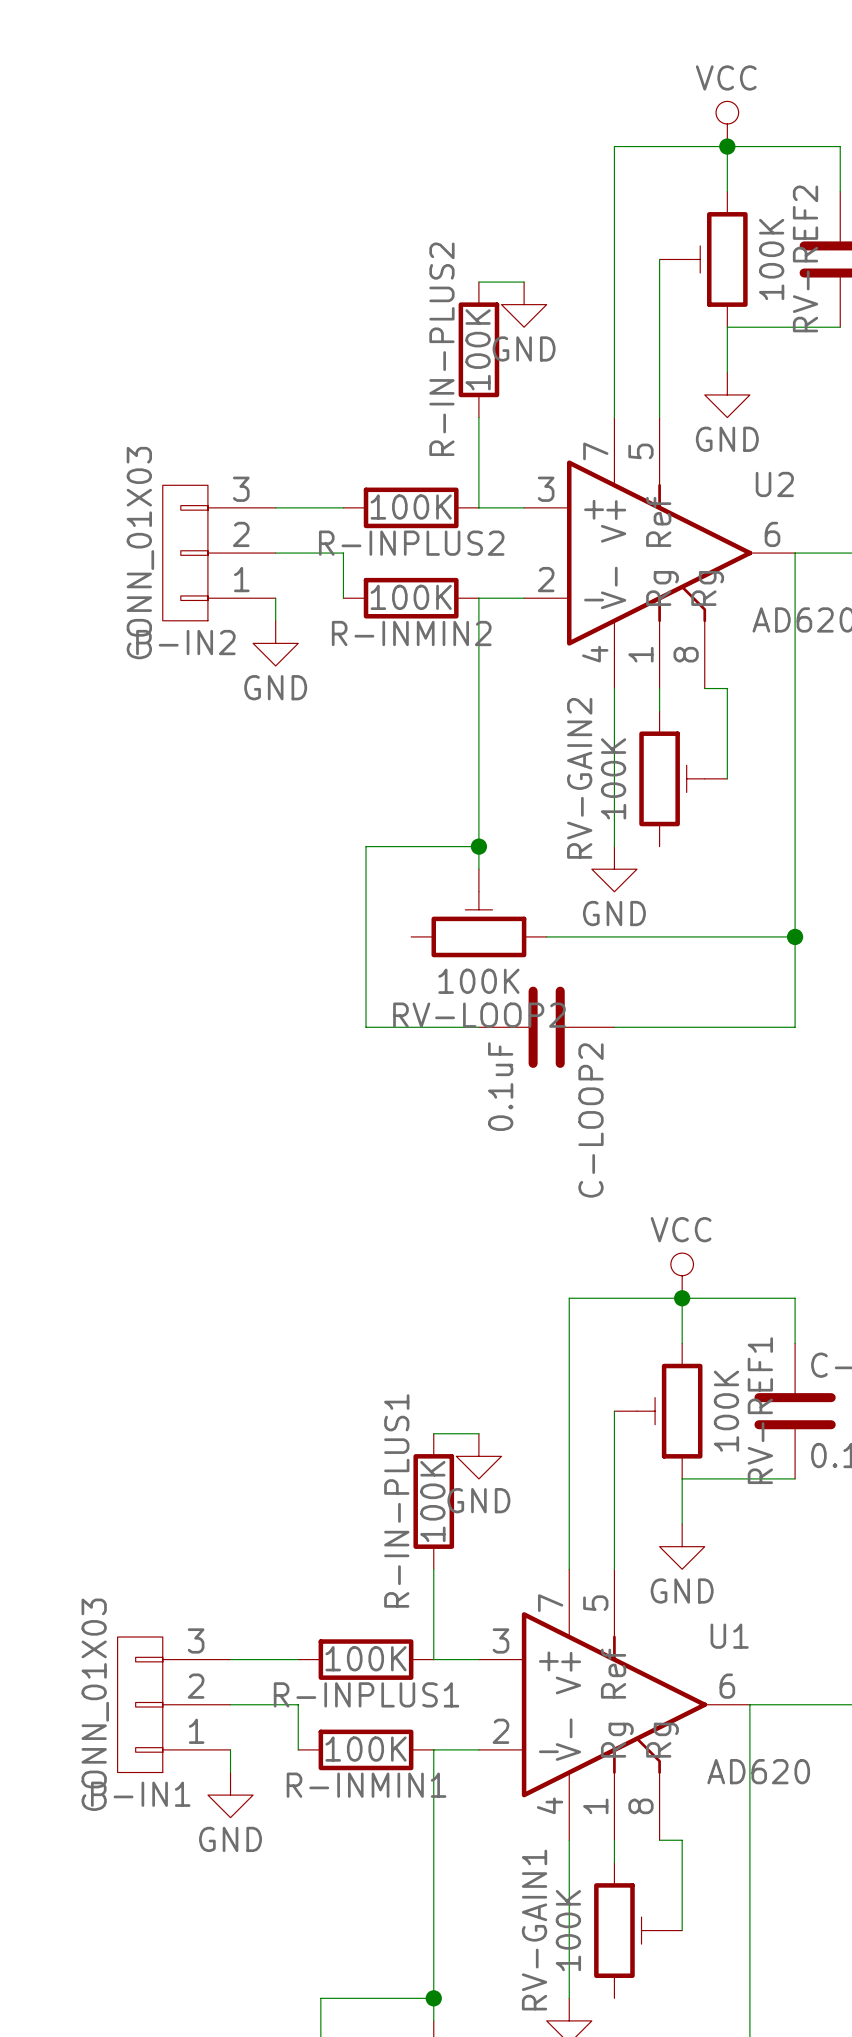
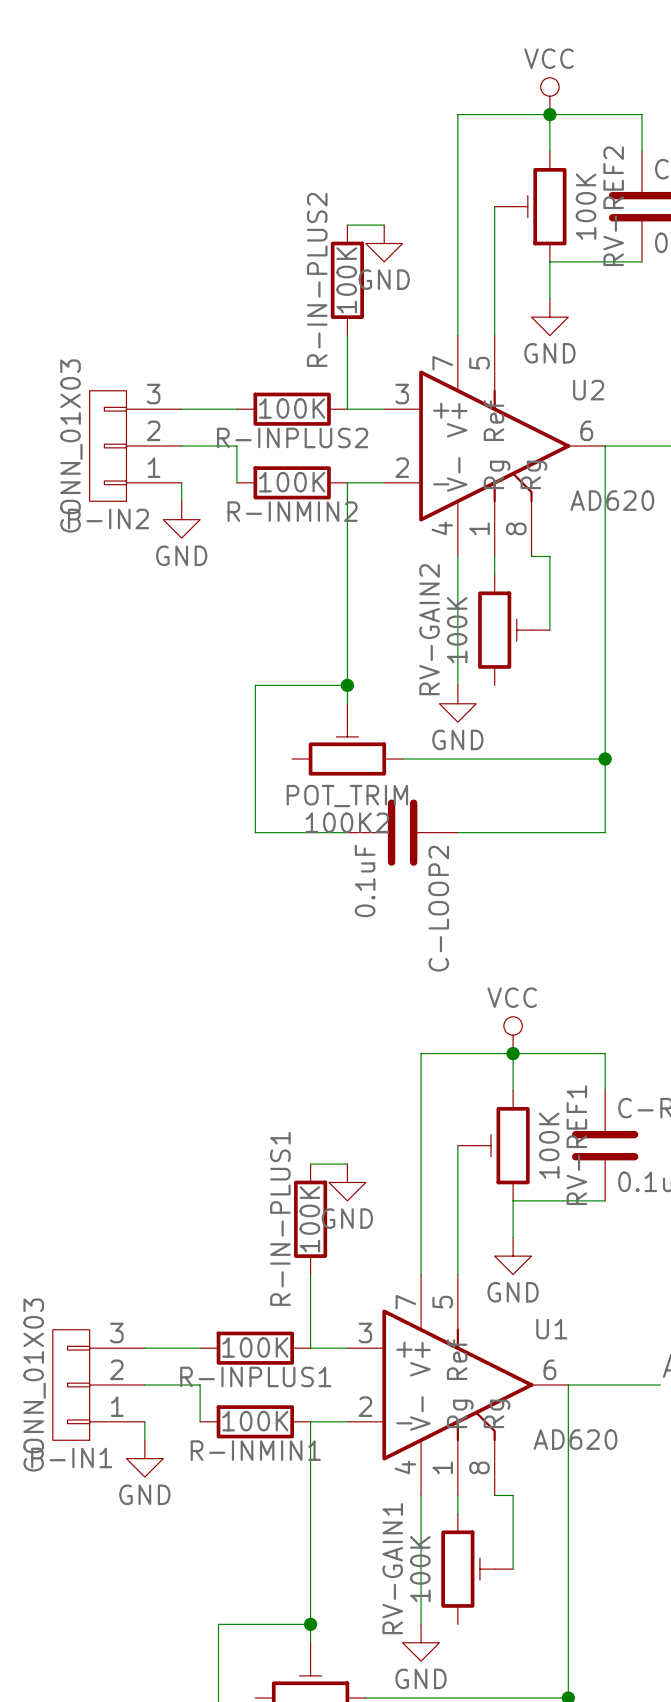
RV-LOOP2 value: 100K (478, 981) -> POT_TRIM (347, 796)
RV-LOOP2 name: RV-LOOP2 (479, 1015) -> 100K2 (347, 822)

